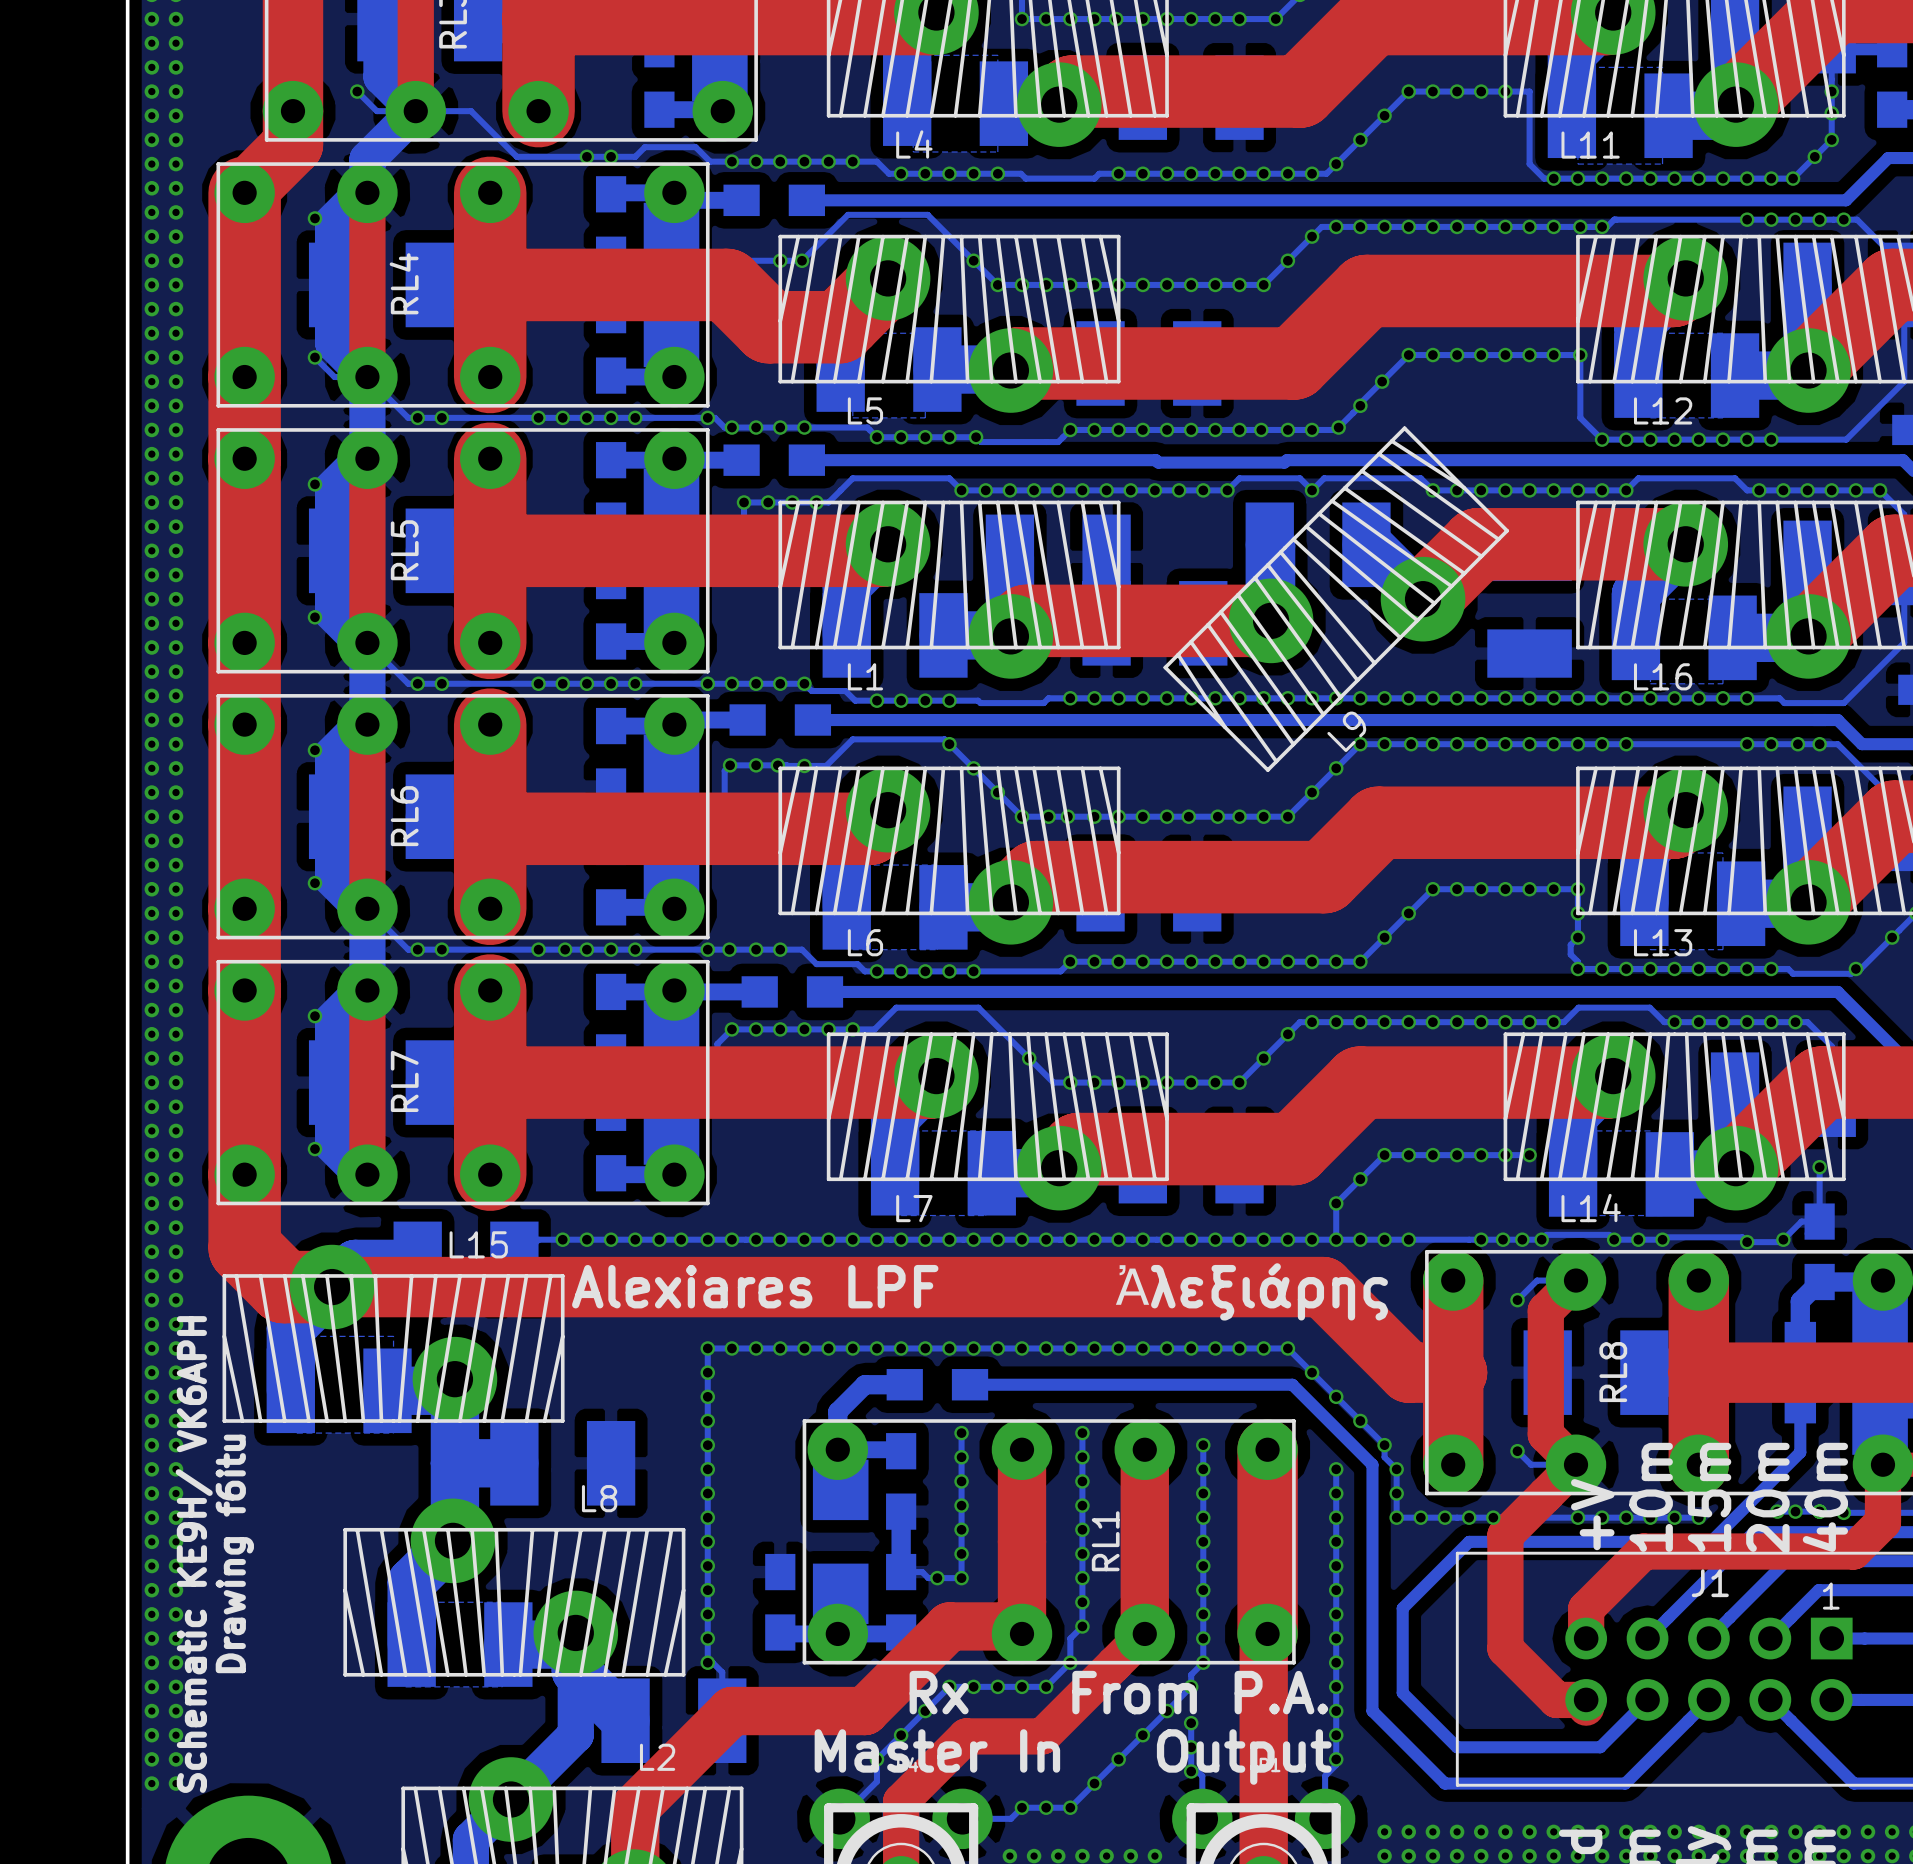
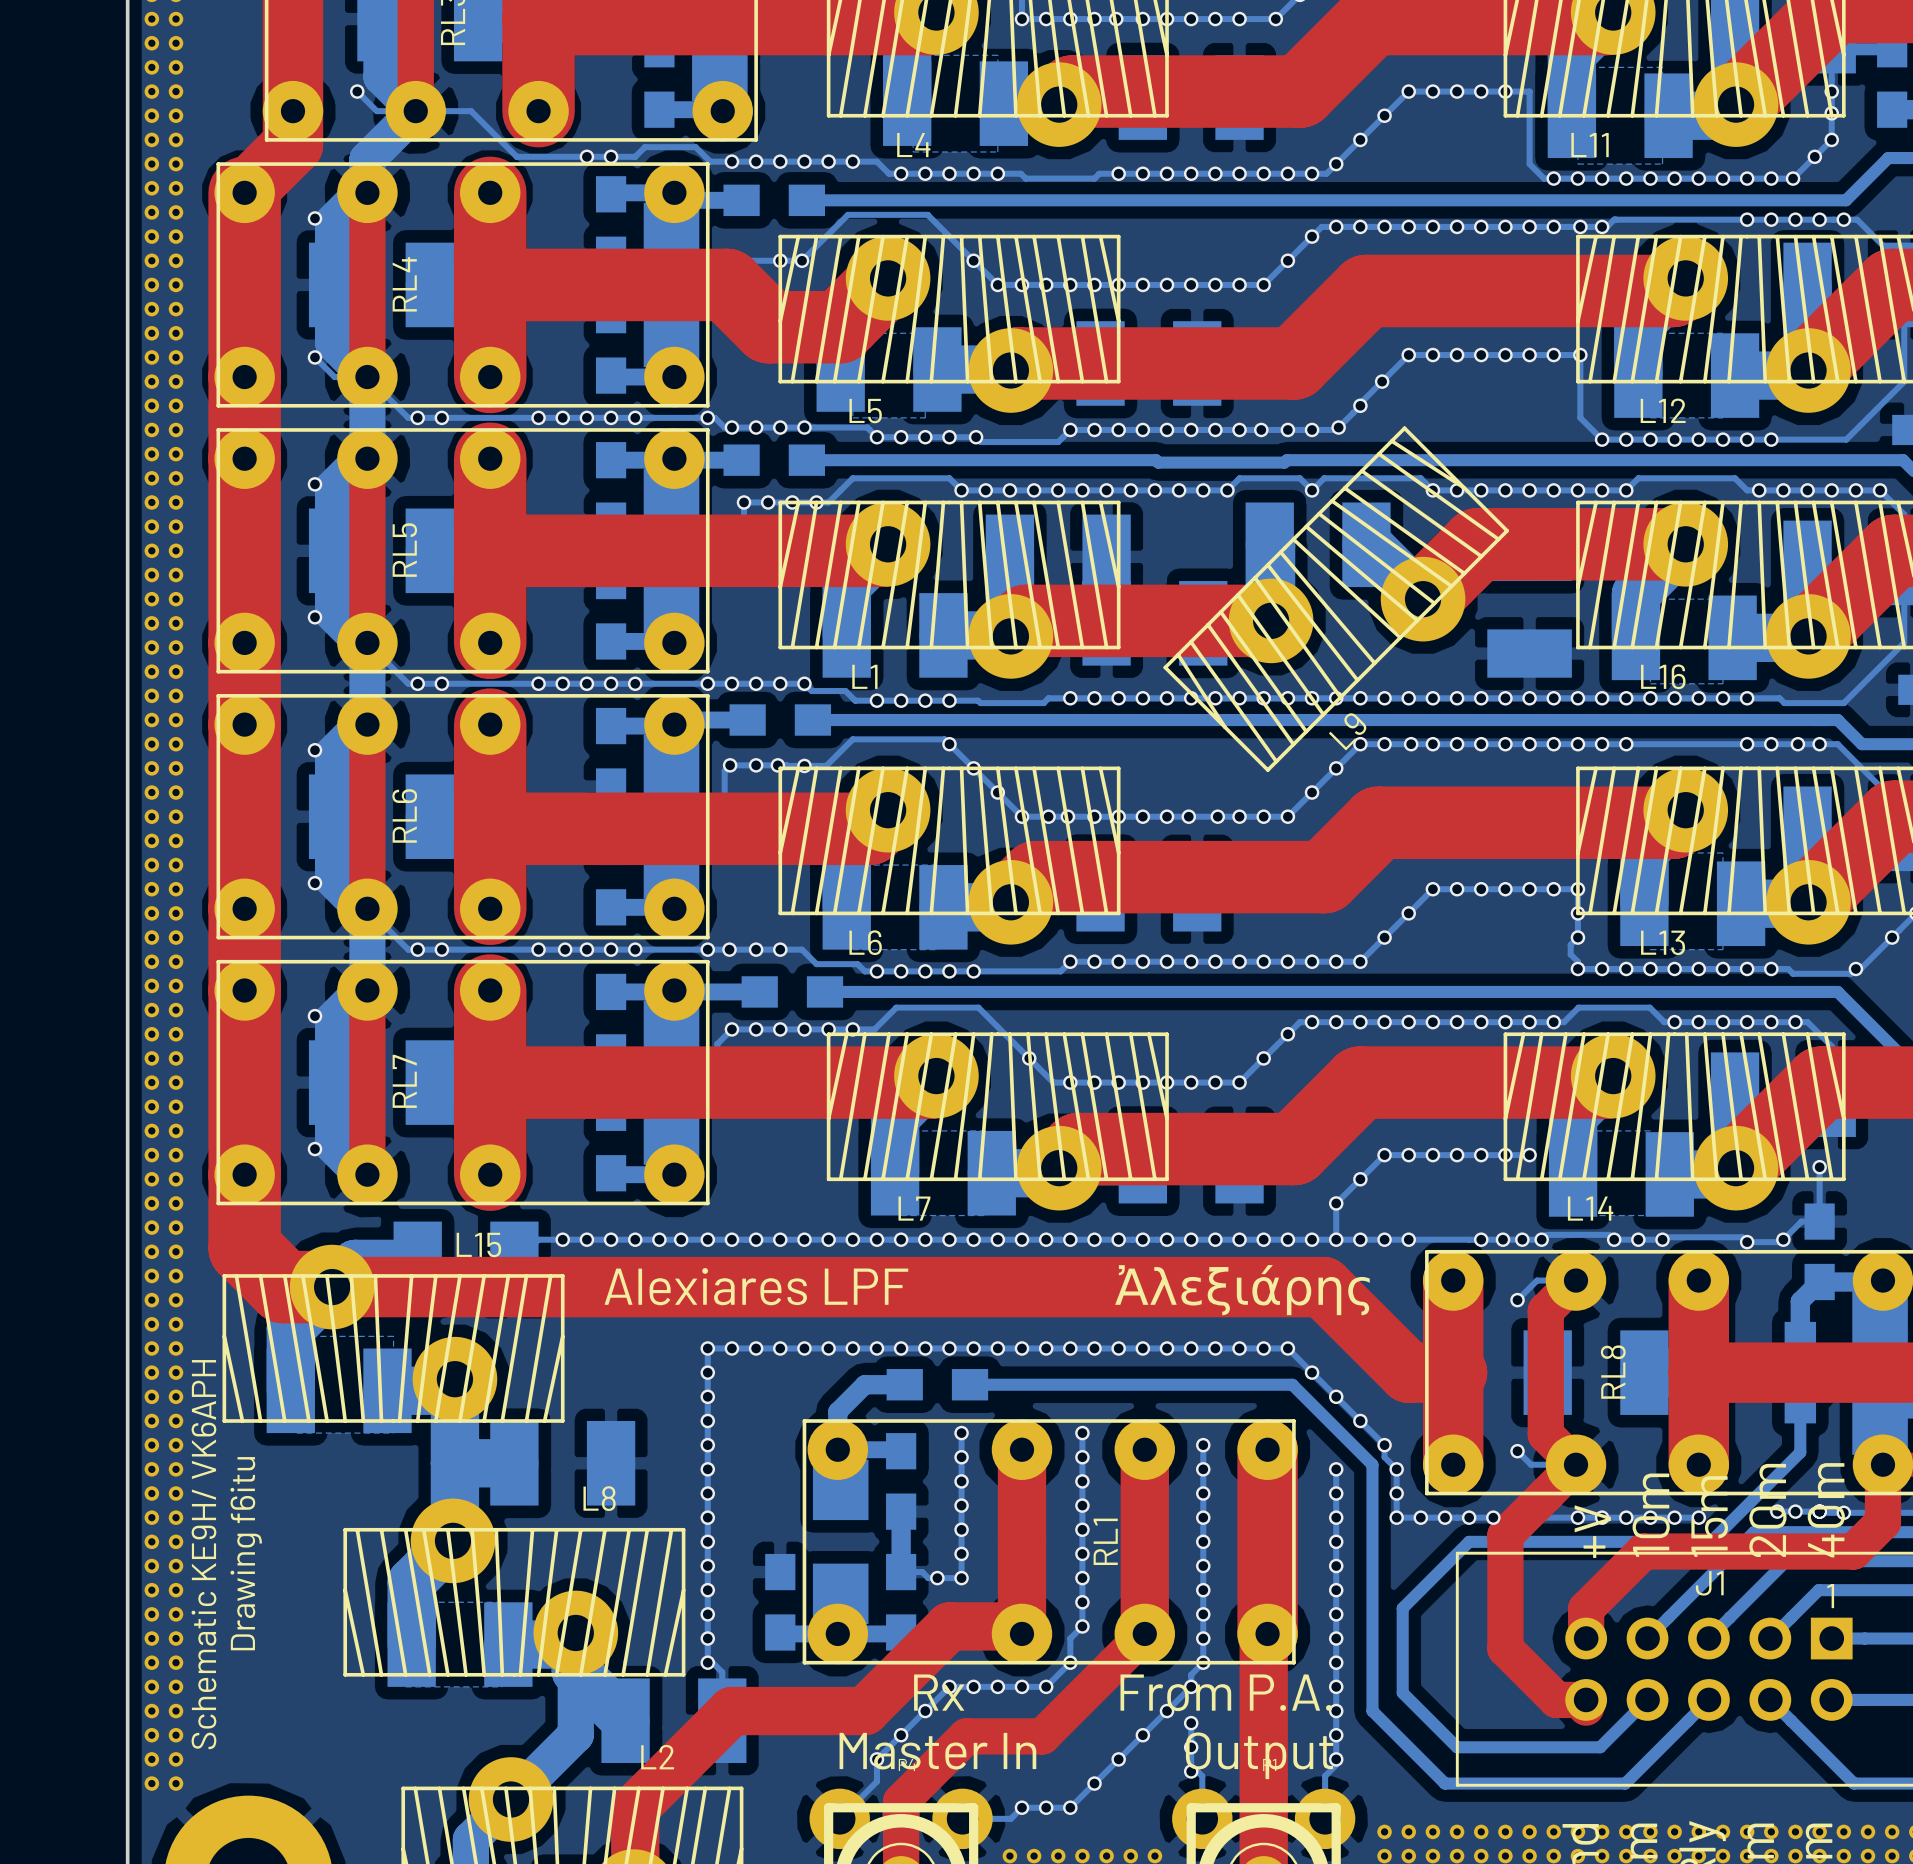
text position: Drawing f6itu (234, 1553) -> Drawing f6itu (246, 1553)
text position: Schematic KE9H/ VK6APH (194, 1554) -> Schematic KE9H/ VK6APH (203, 1554)

